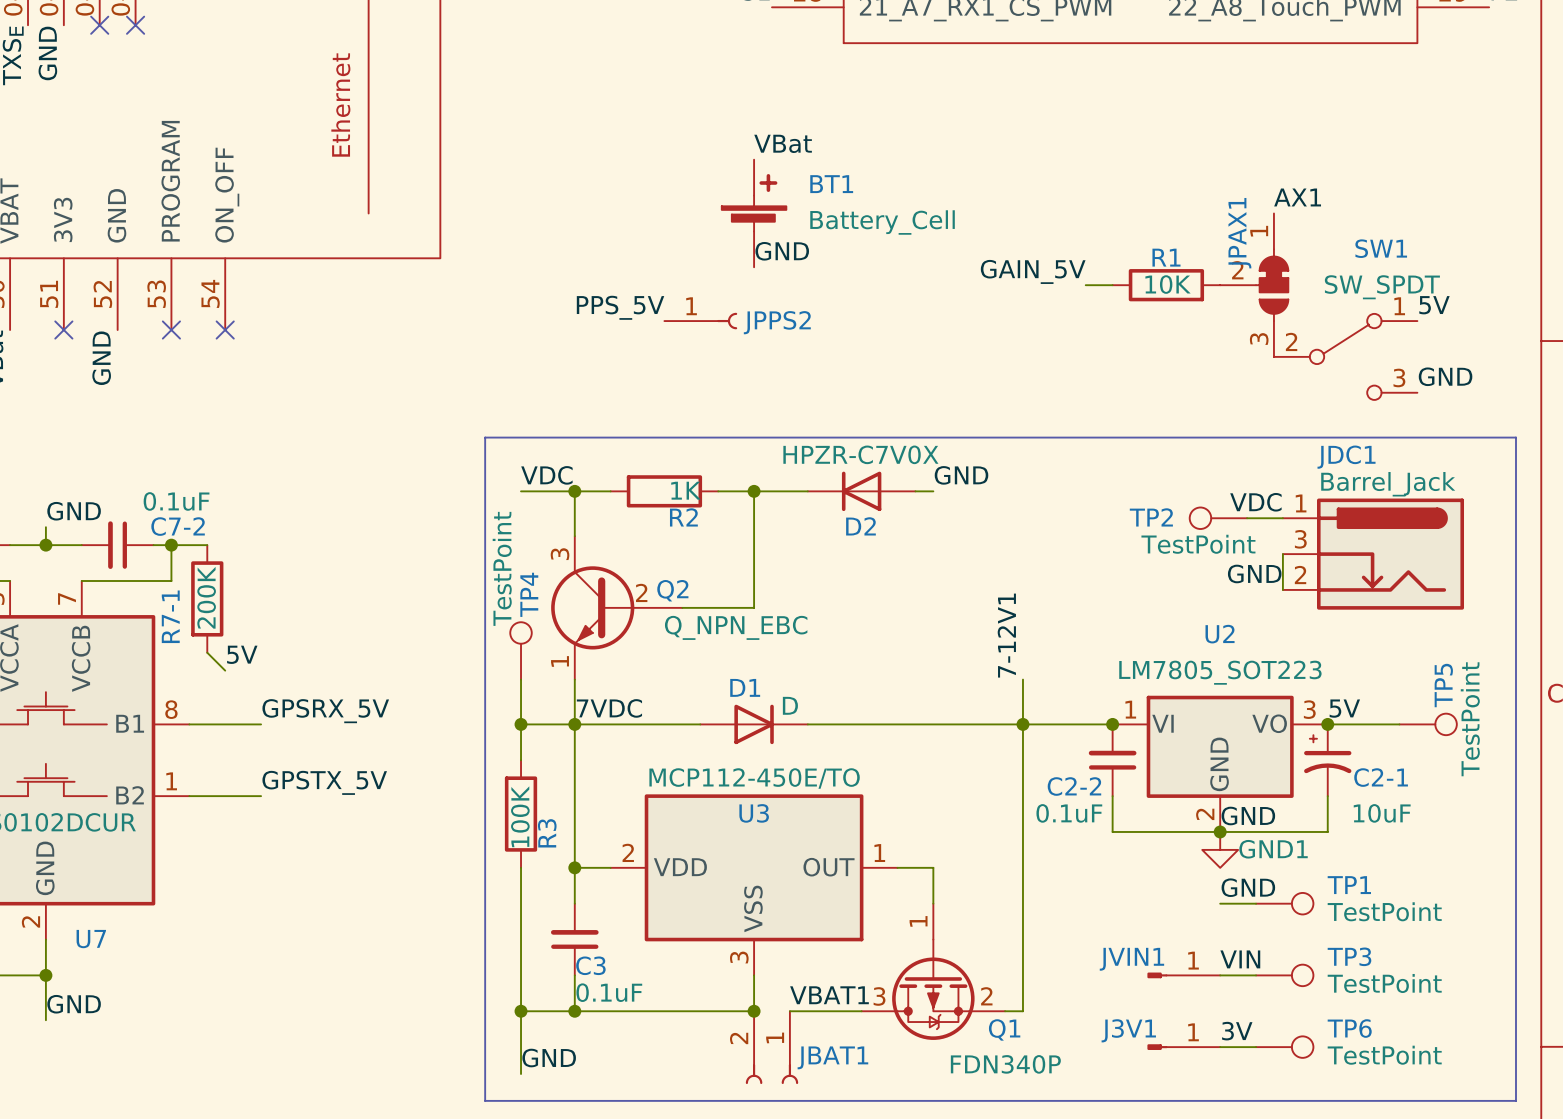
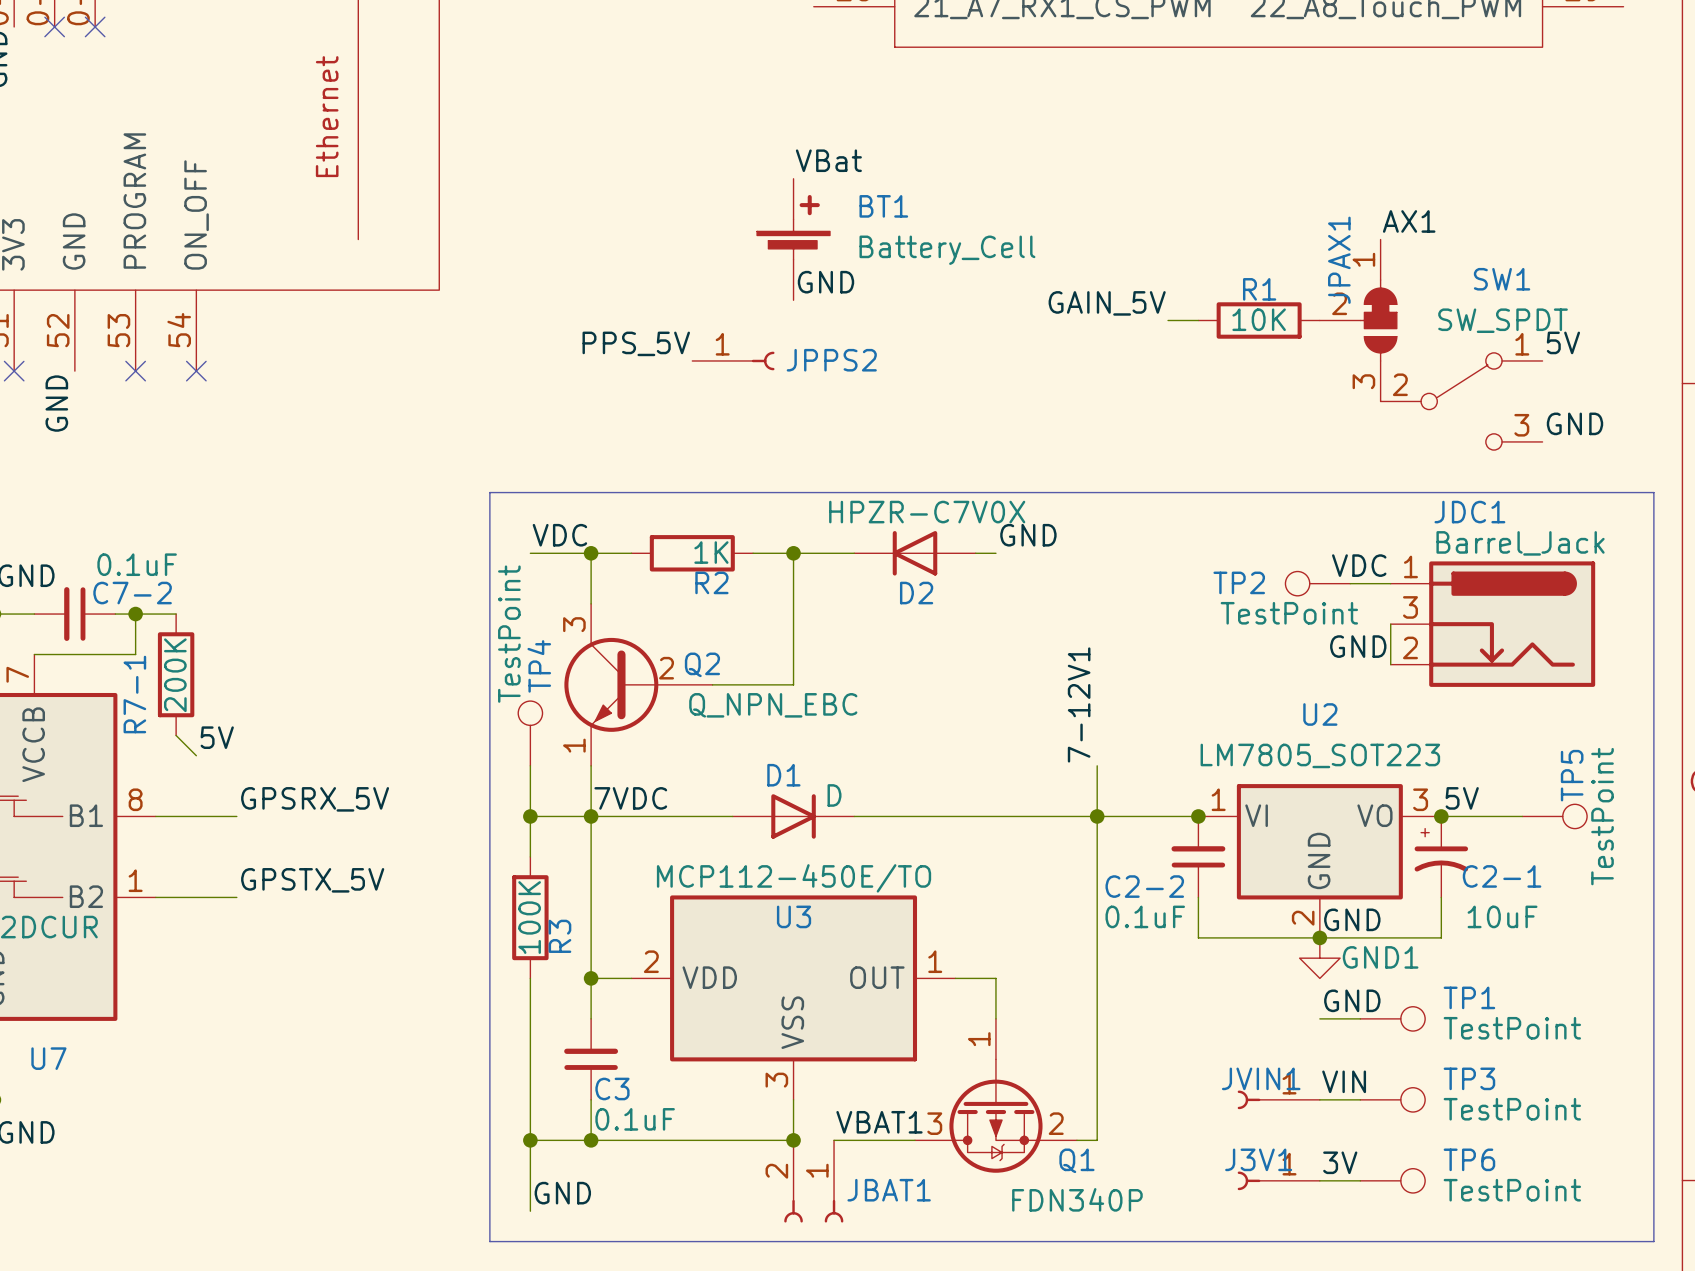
JVIN1 name position: JVIN1 (1131, 959) -> JVIN1 (1261, 1078)
JVIN1 symbol: [1147, 972, 1221, 979] -> [1237, 1090, 1320, 1110]
J3V1 name position: J3V1 (1128, 1030) -> J3V1 (1258, 1159)
J3V1 symbol: [1147, 1044, 1221, 1050] -> [1237, 1171, 1320, 1191]

